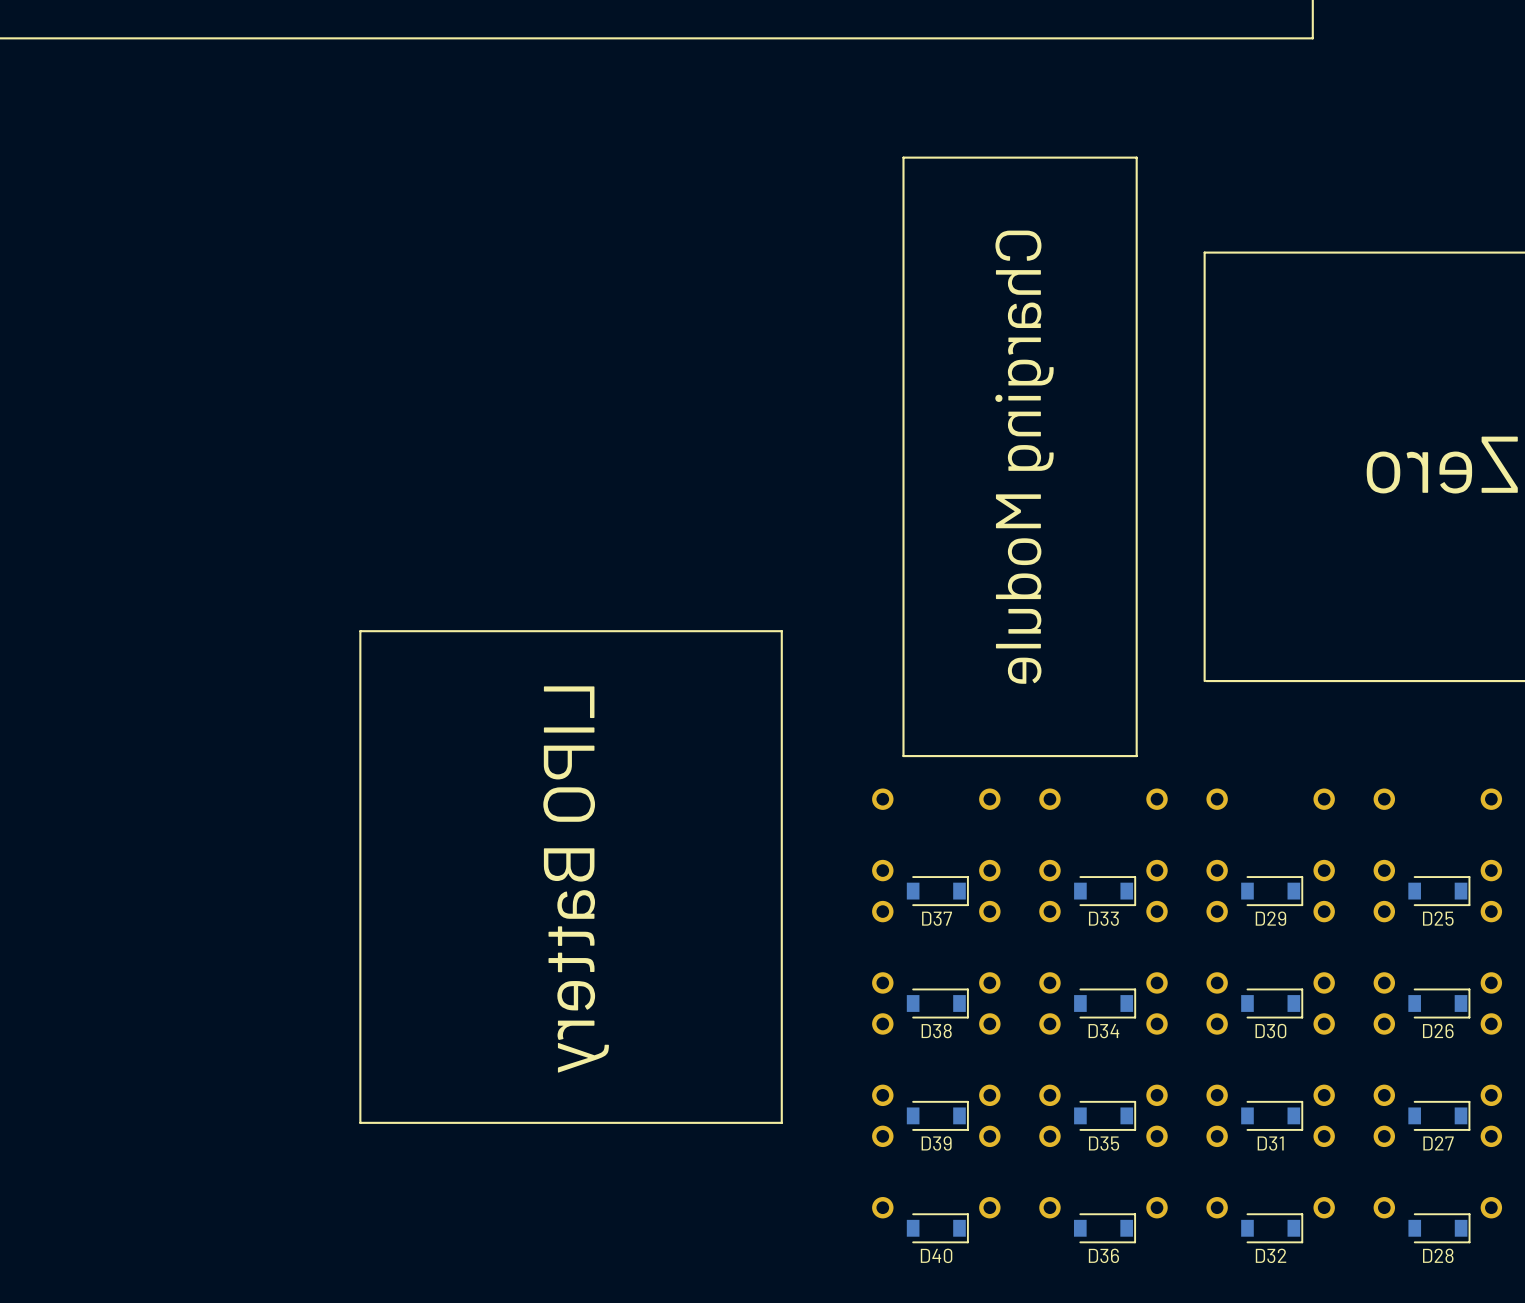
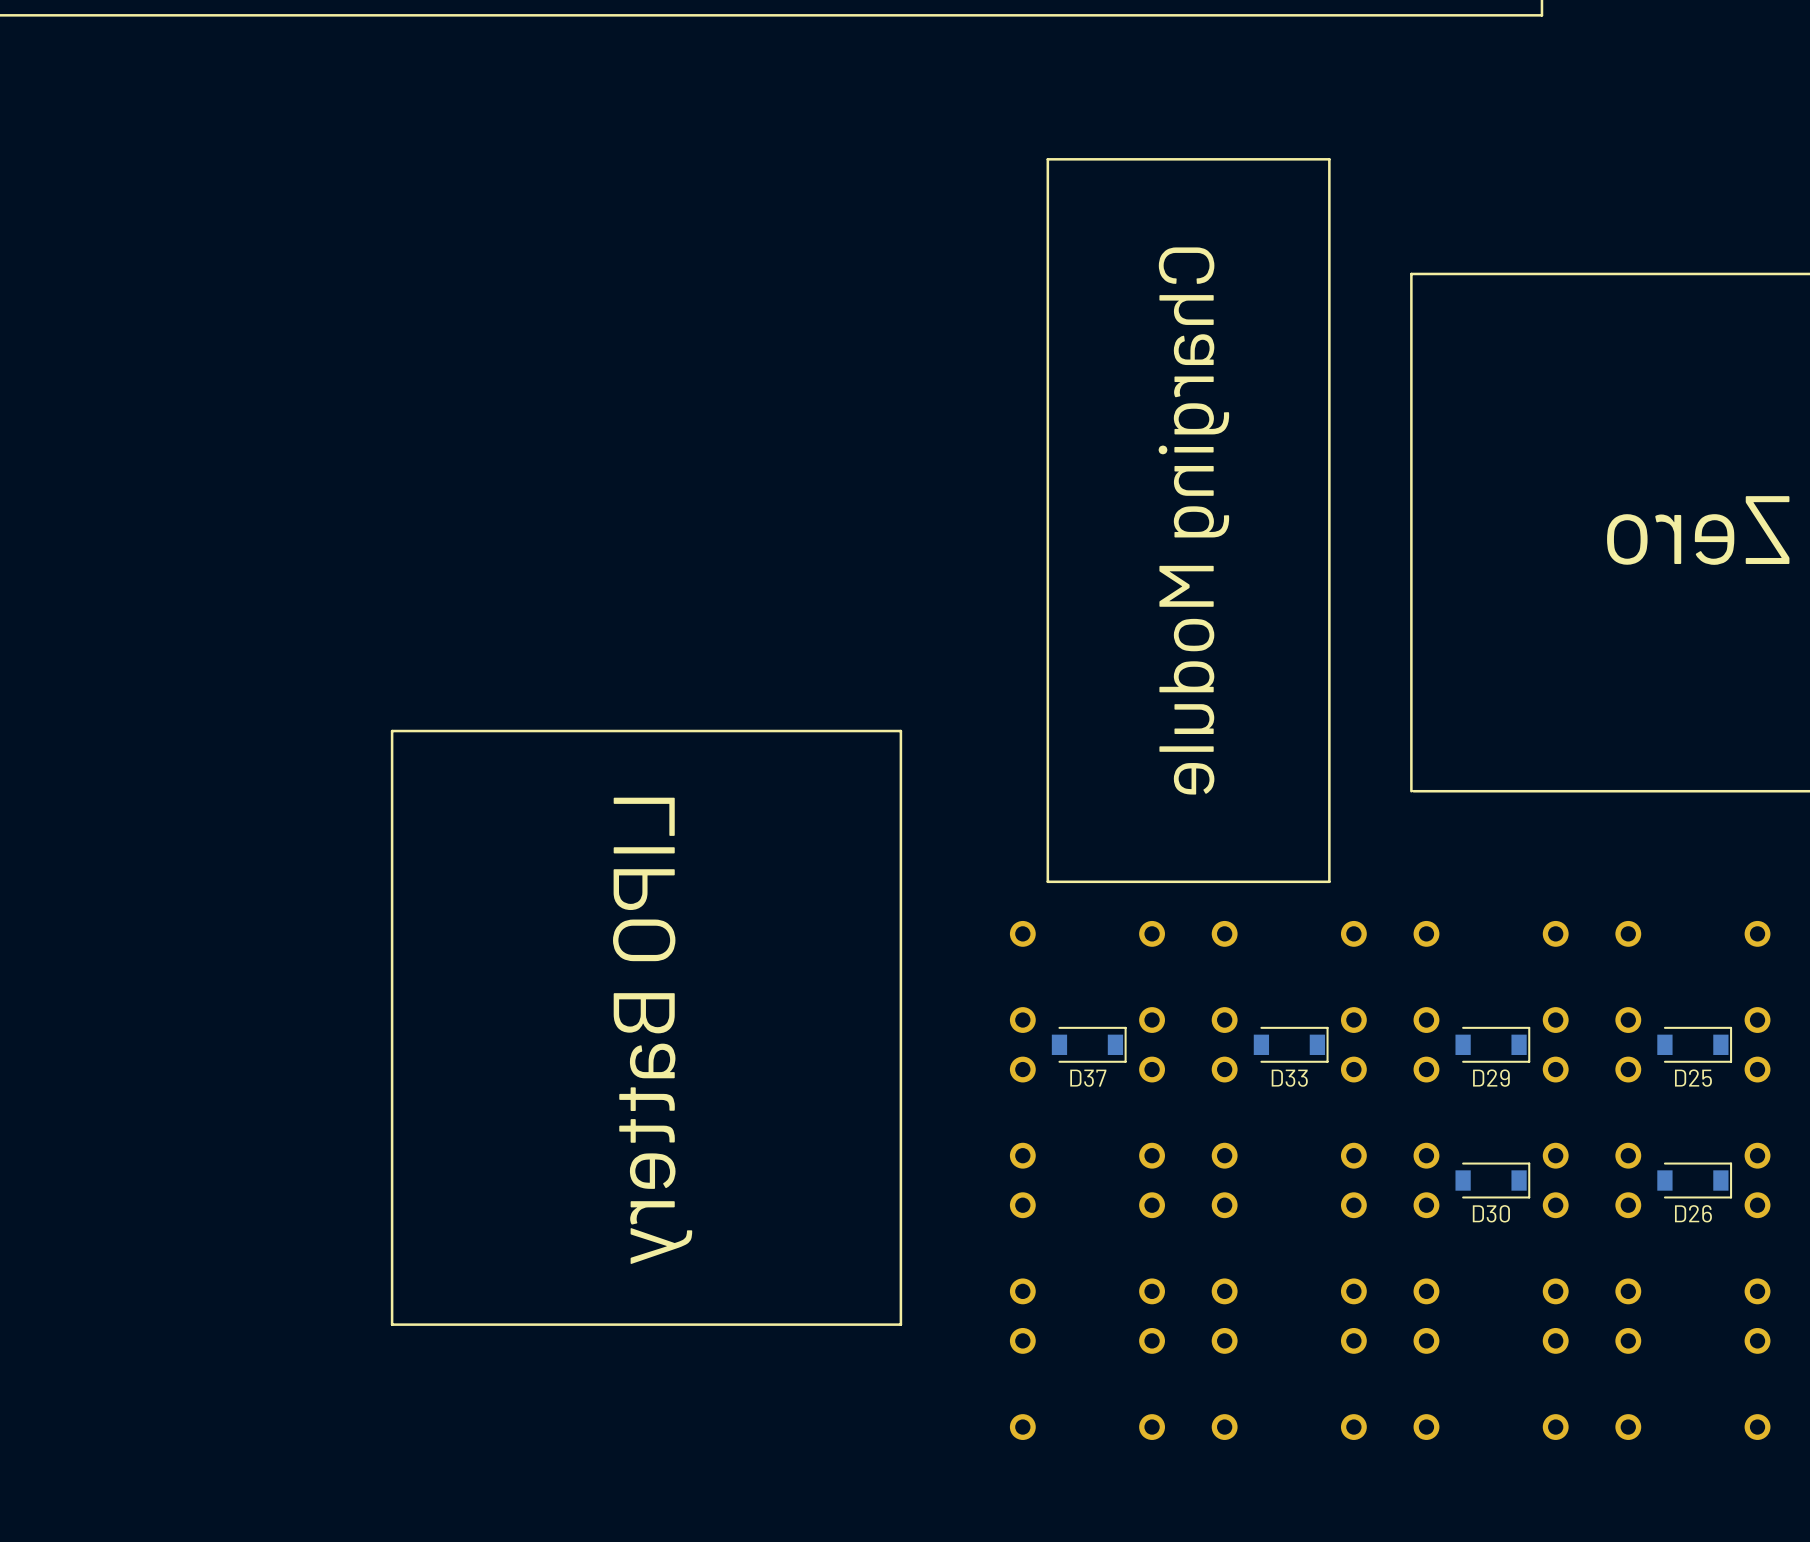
D38: (937, 1003) -> none
D34: (1105, 1003) -> none
D39: (937, 1115) -> none
D35: (1105, 1115) -> none
D31: (1272, 1115) -> none
D27: (1439, 1115) -> none
D40: (937, 1228) -> none
D36: (1104, 1228) -> none
D32: (1272, 1228) -> none
D28: (1439, 1228) -> none

